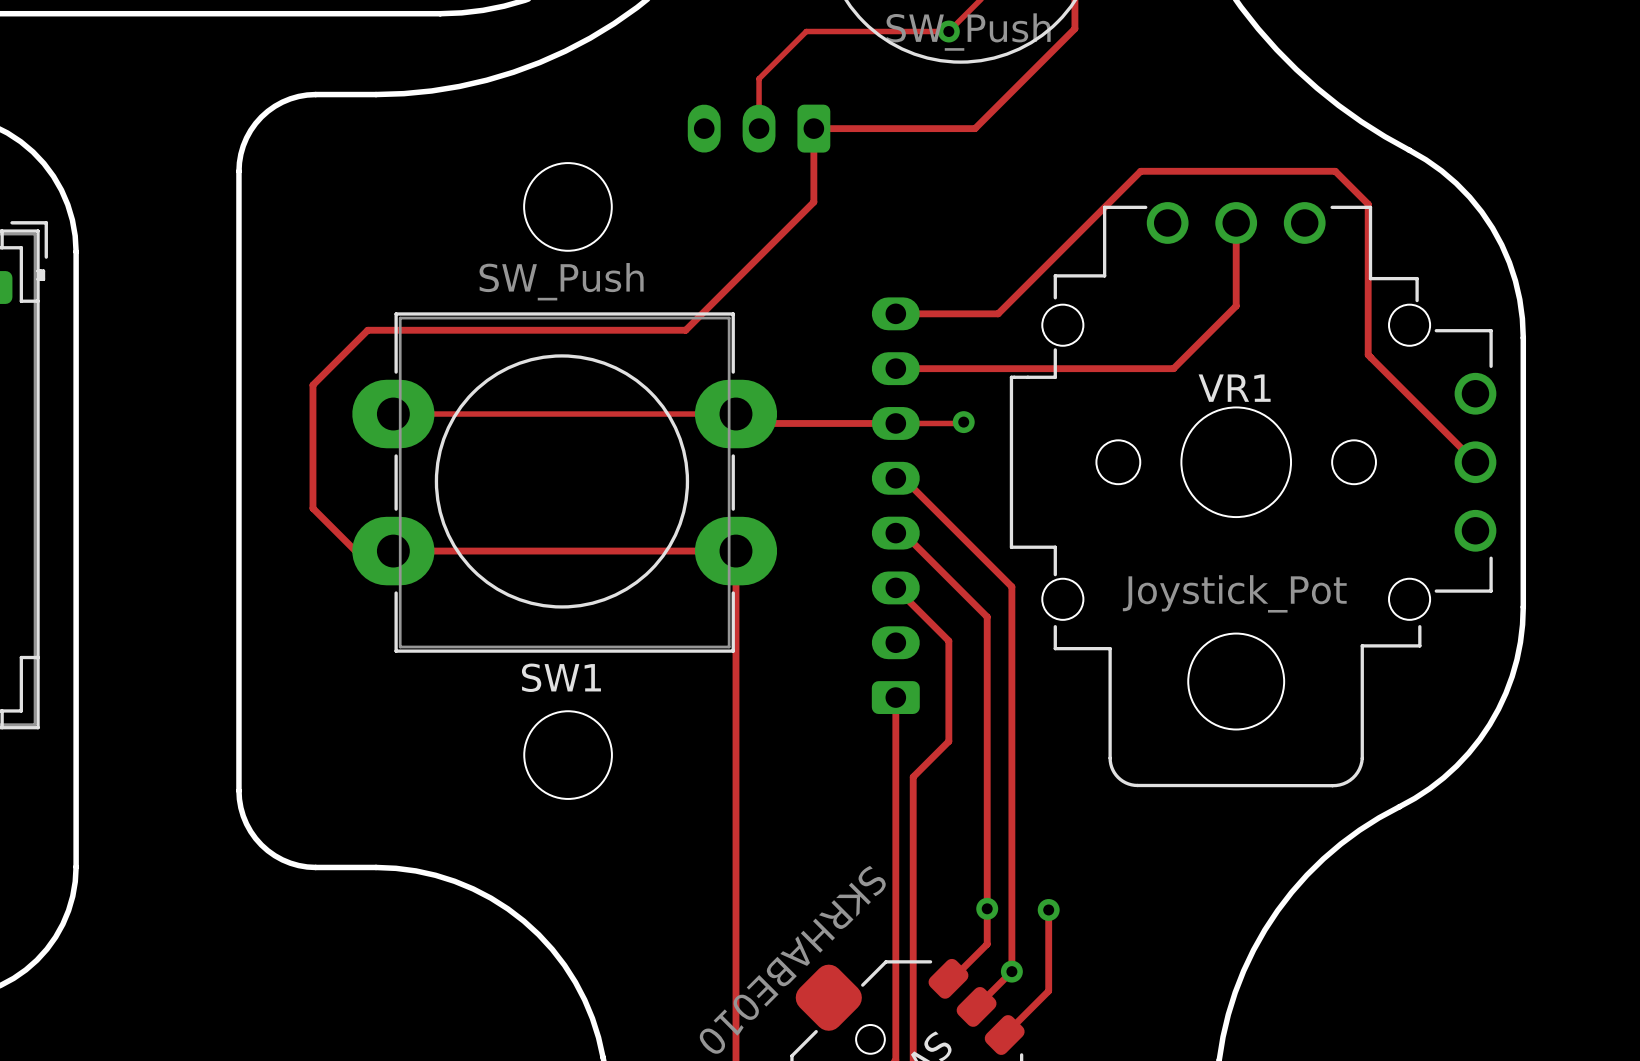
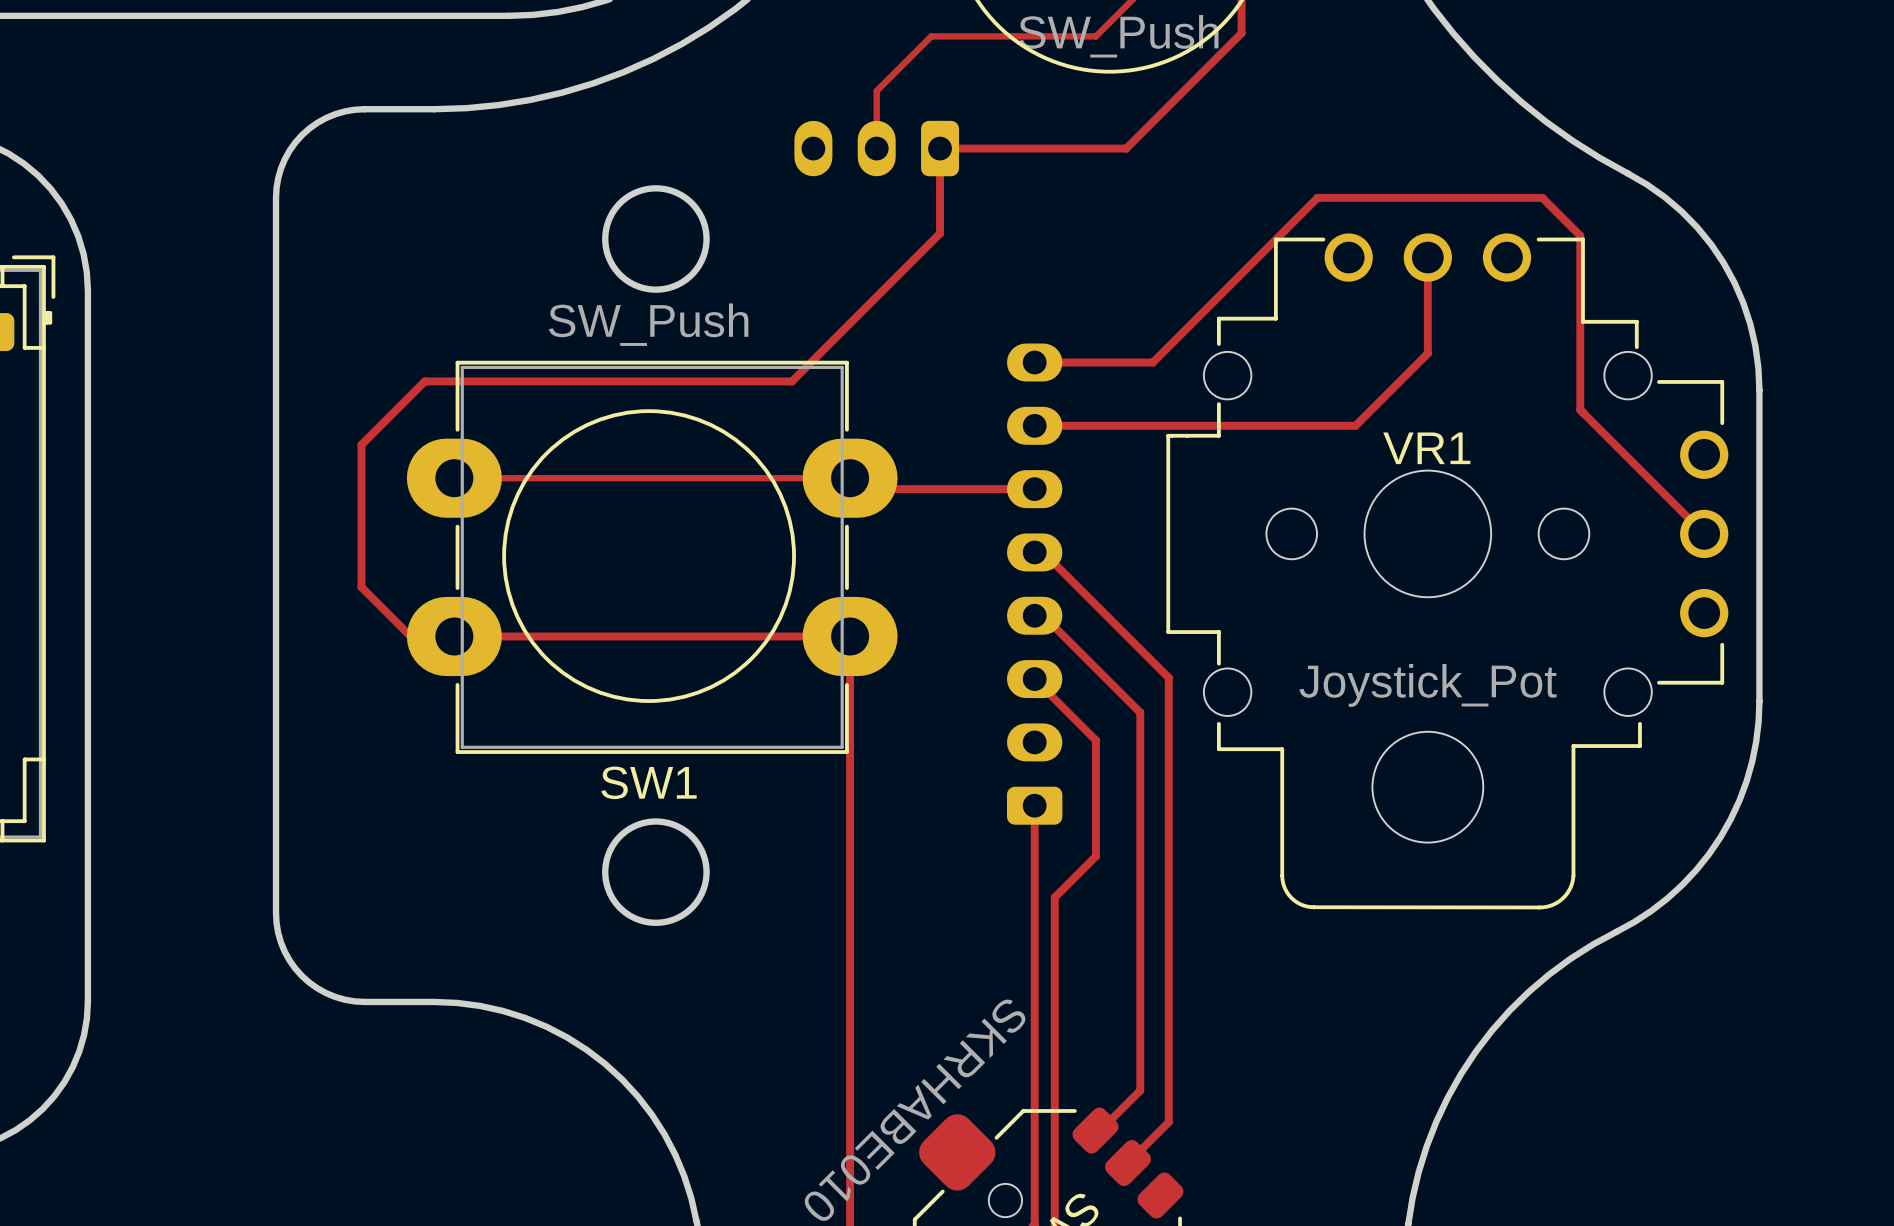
via: (948, 31) -> none
round board edge: none -> [602, 185, 710, 293]
track: (963, 422) (895, 423) -> none
via: (963, 422) -> none
round board edge: none -> [602, 818, 710, 926]
via: (987, 908) -> none
track: (1048, 909) (1048, 991) (1004, 1035) -> none
via: (1048, 909) -> none
via: (1011, 971) -> none

